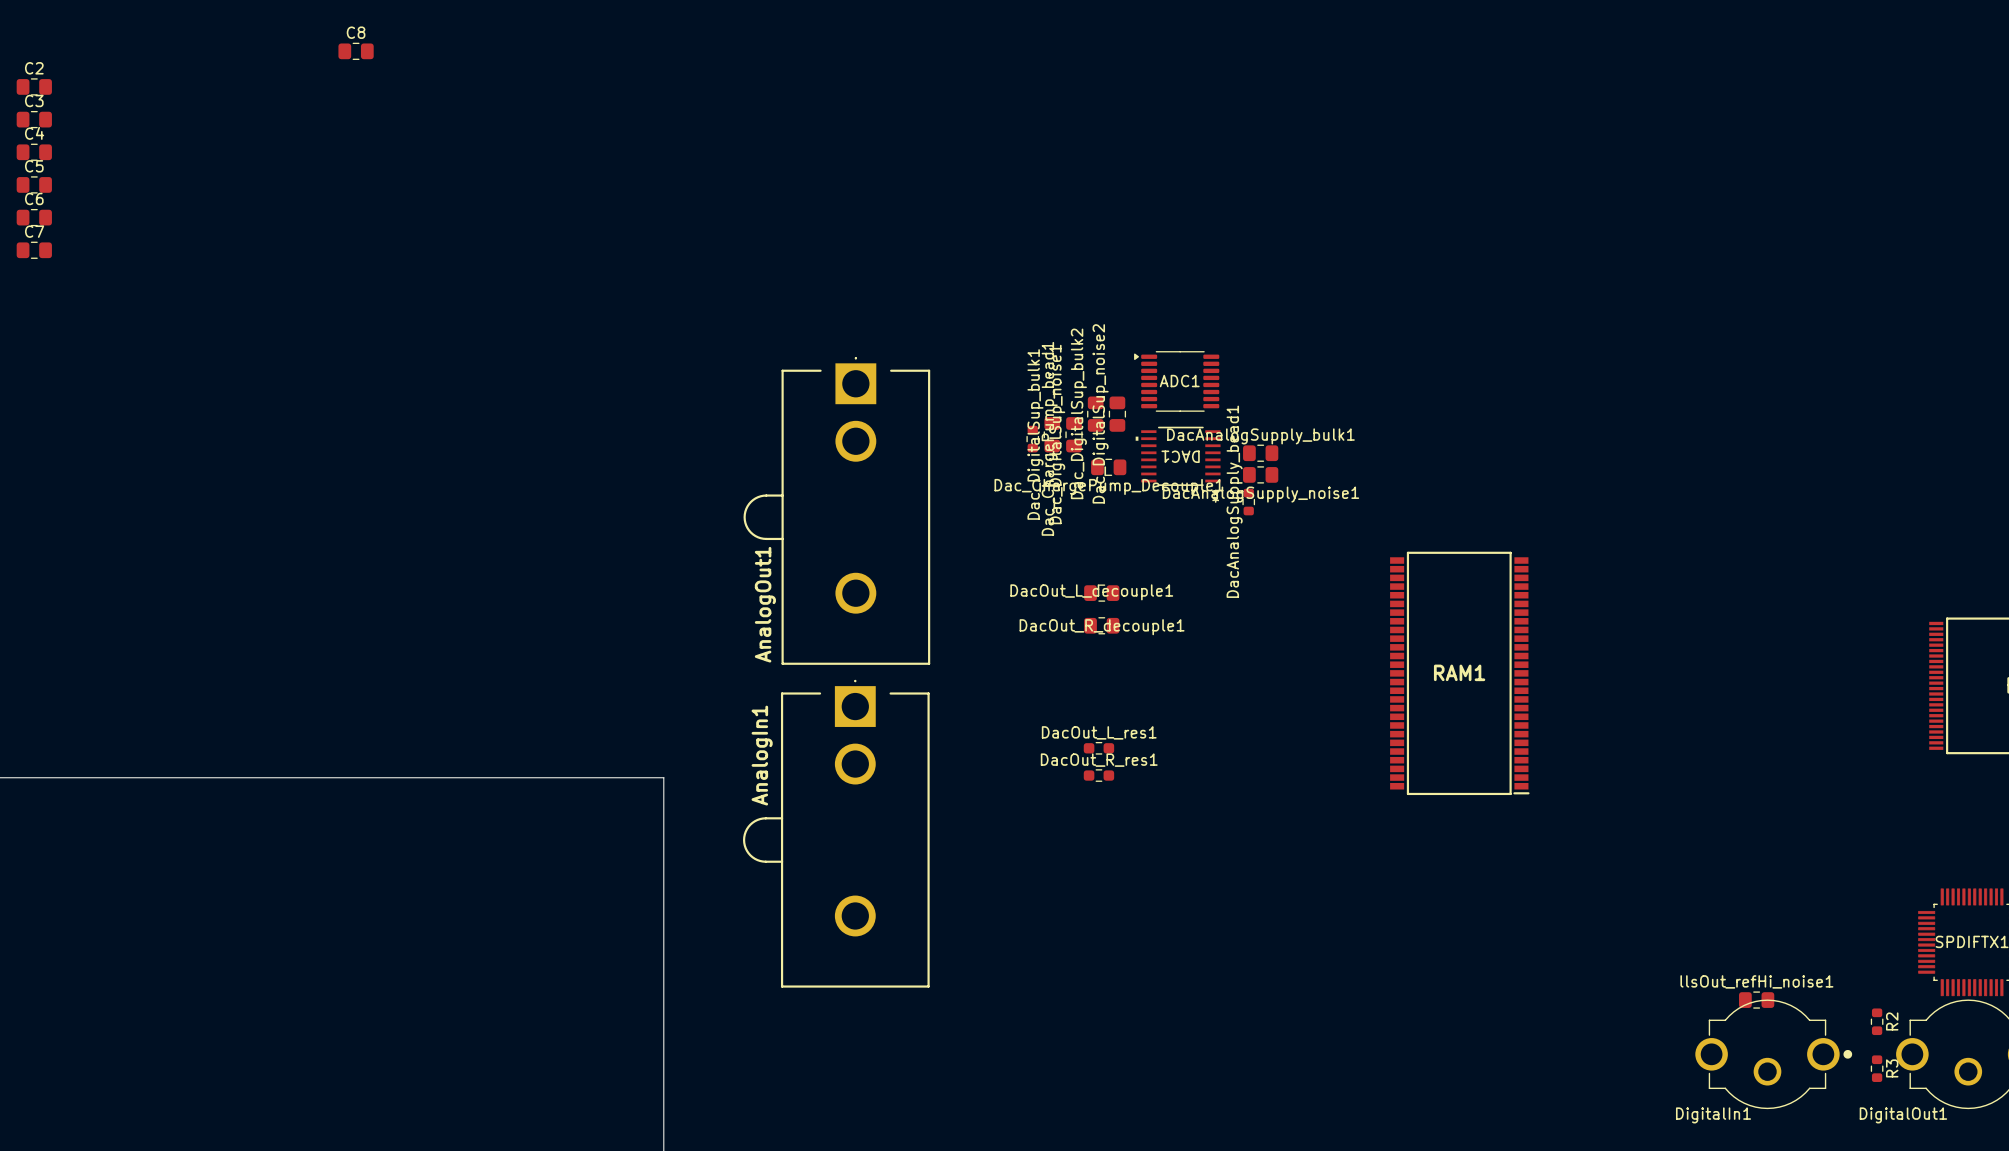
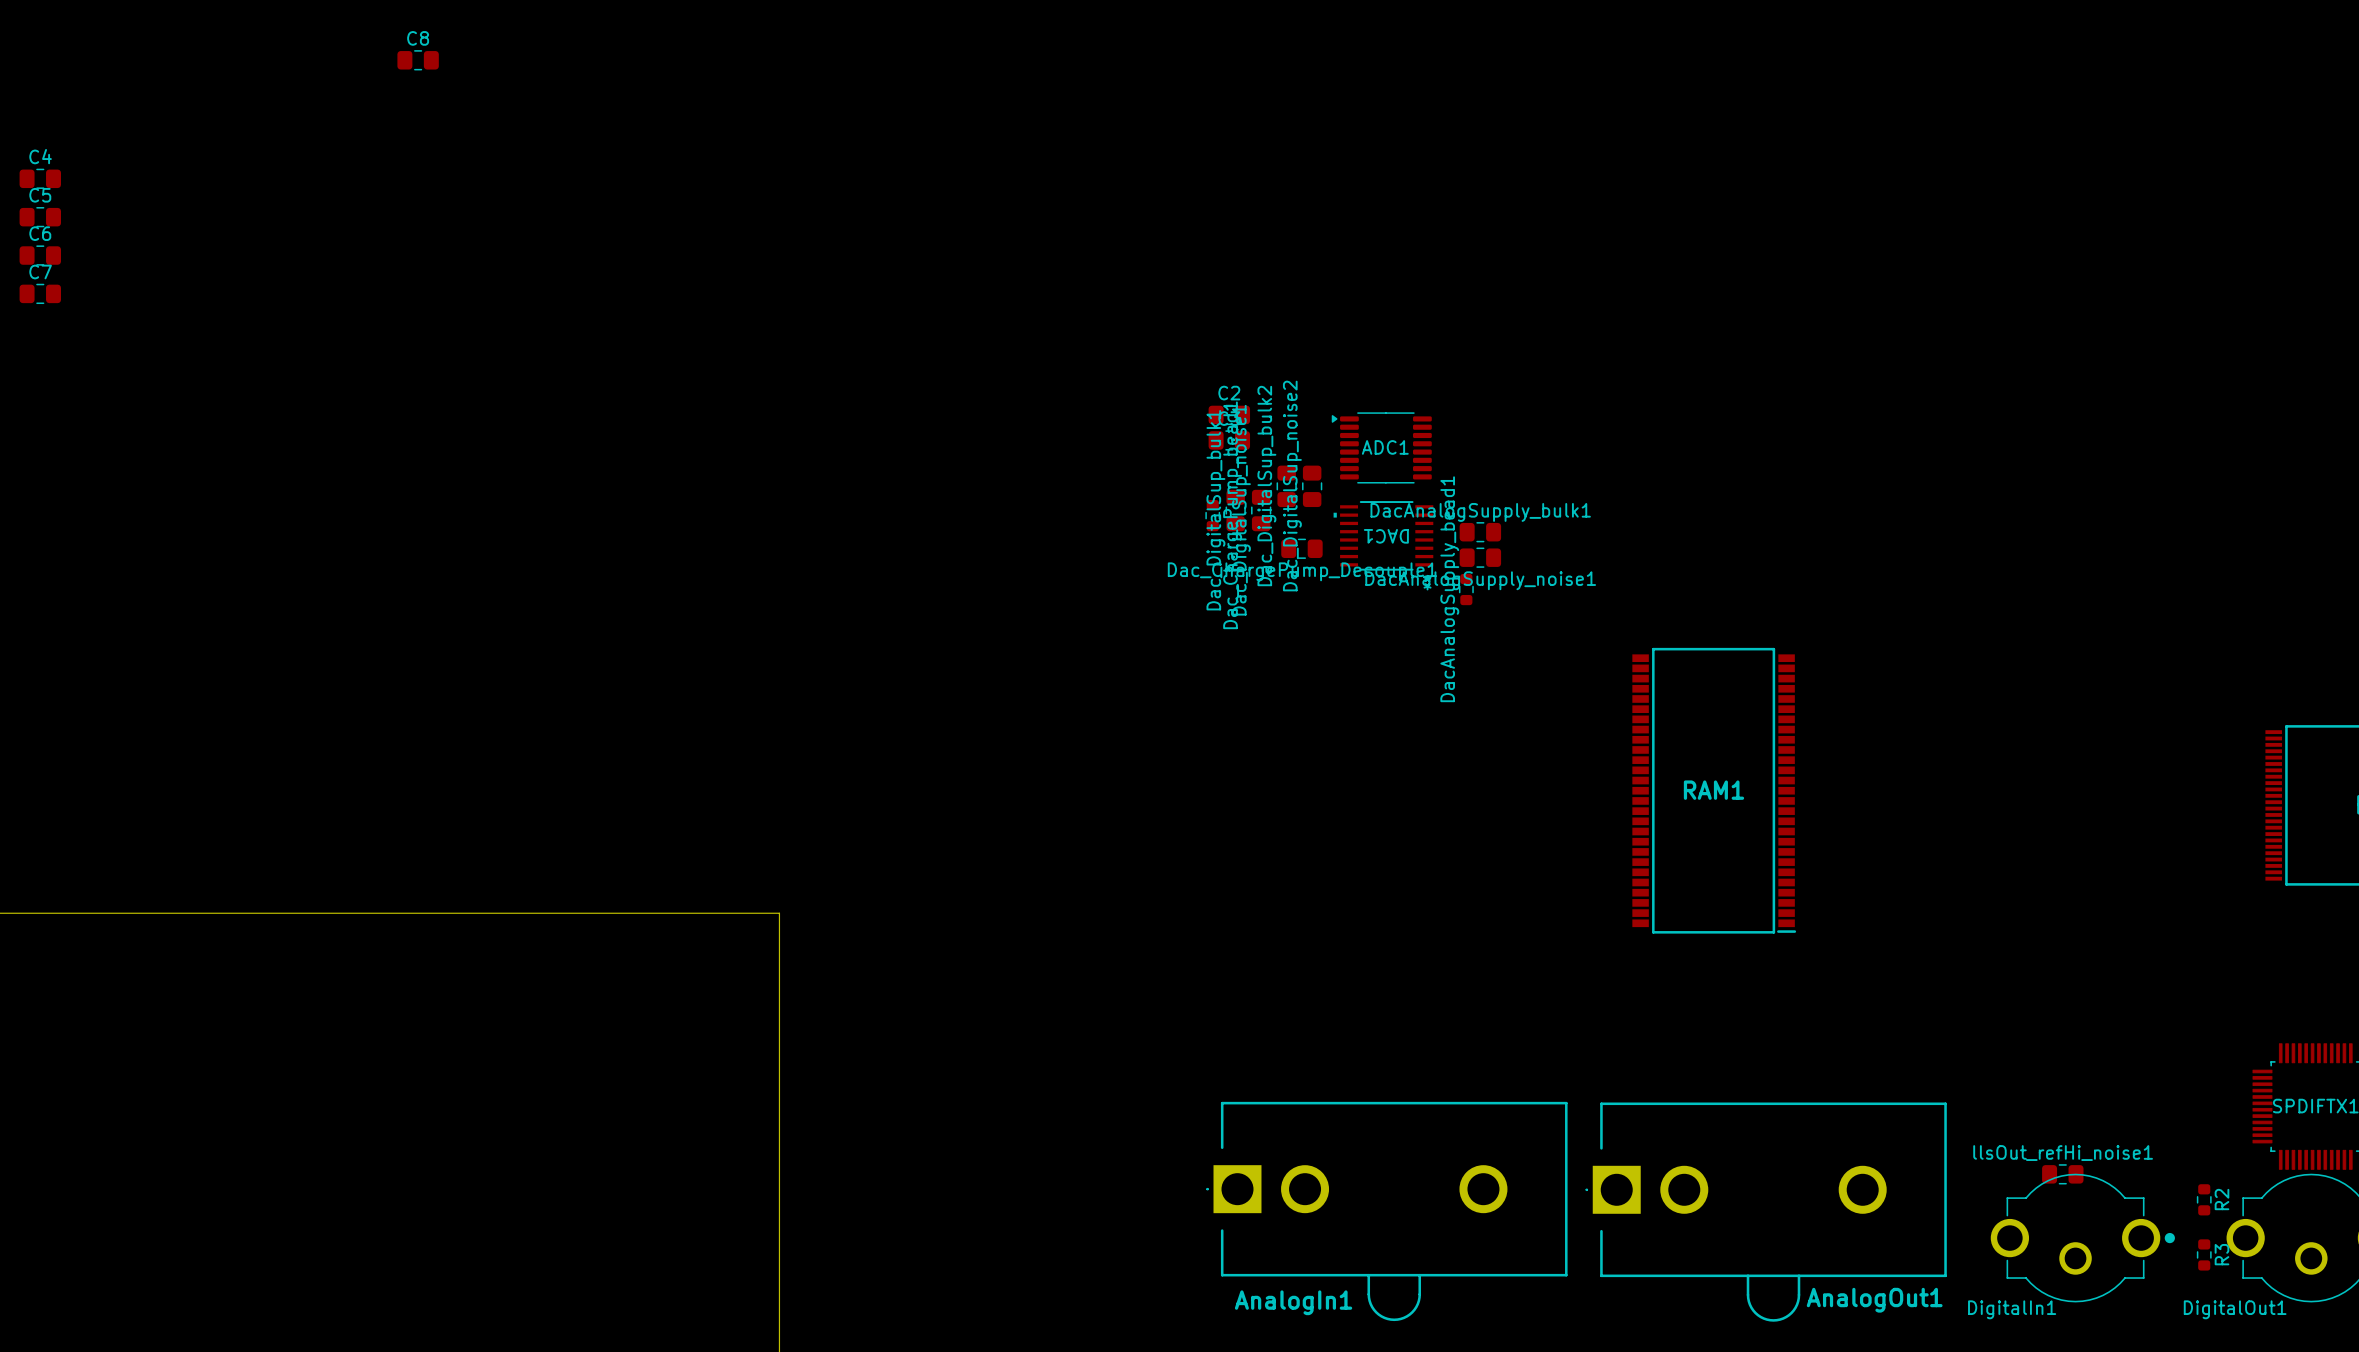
C2 position: (34, 86) -> (1229, 414)
C3 position: (34, 119) -> (1229, 440)
AnalogOut1 rotation: 0° (836, 511) -> 90° counterclockwise (1766, 1212)
AnalogOut1 position: (836, 511) -> (1766, 1212)
DacOut_L_decouple1: (1101, 593) -> none
DacOut_R_decouple1: (1101, 625) -> none
DacOut_L_res1: (1098, 748) -> none
DacOut_R_res1: (1098, 775) -> none
AnalogIn1 rotation: 0° (836, 833) -> 90° counterclockwise (1386, 1211)
AnalogIn1 position: (836, 833) -> (1386, 1211)

